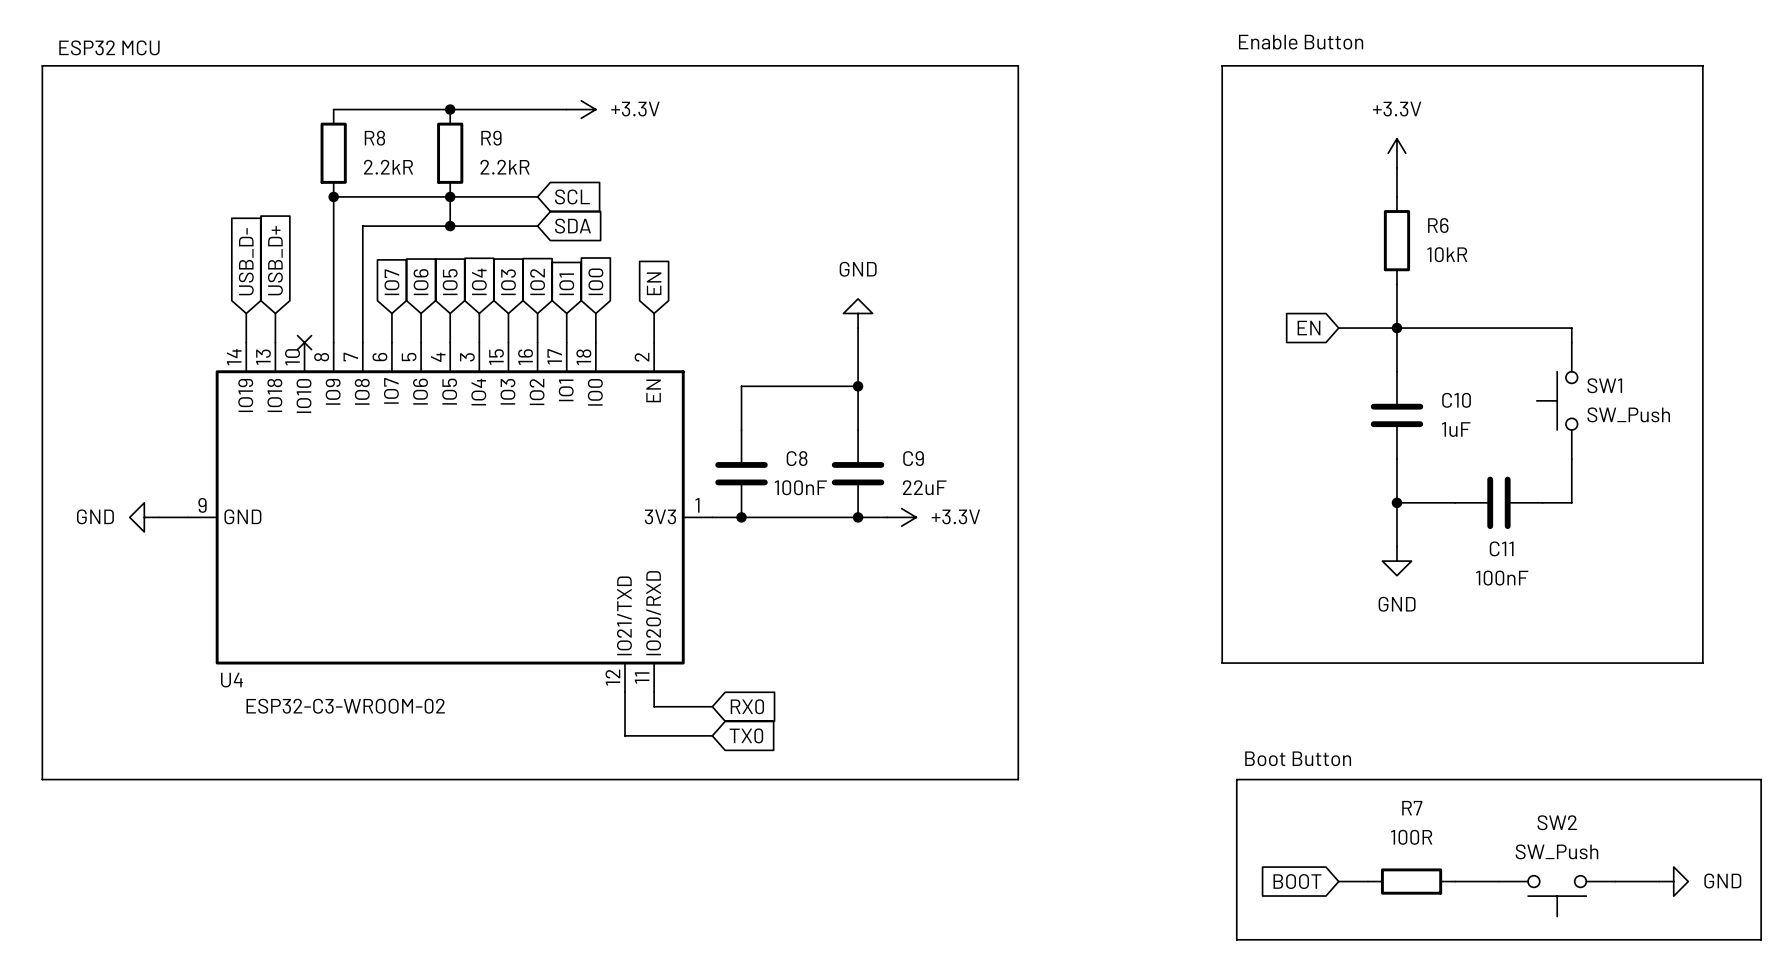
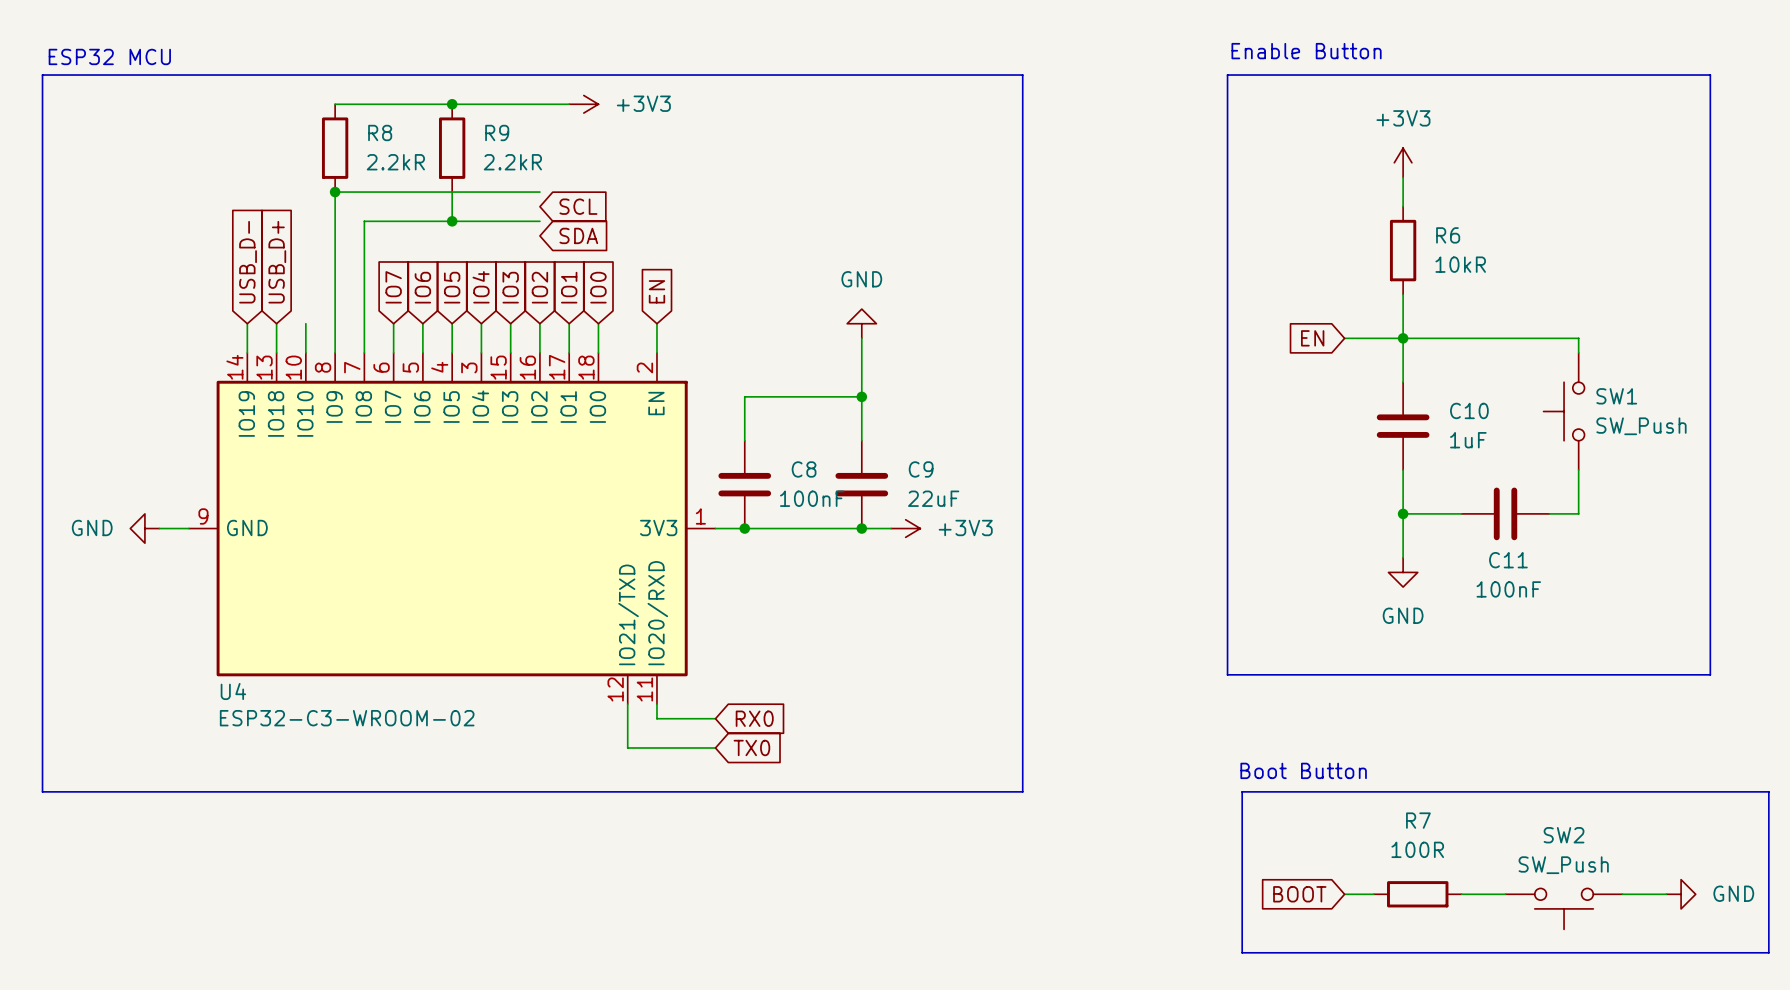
power symbol: none -> +3V3 (583, 104)
wire: (333, 109) (566, 109) -> (335, 104) (569, 104)
junction position: (450, 109) -> (452, 104)
power symbol: +3.3V (581, 109) -> none
R8 position: (333, 153) -> (335, 148)
R9 position: (450, 153) -> (452, 148)
power symbol: +3.3V (1396, 153) -> +3V3 (1403, 162)
wire: (333, 196) (537, 196) -> (335, 206) (335, 192) (539, 192)
junction position: (333, 196) -> (335, 192)
junction: (450, 196) -> none
junction: none -> (452, 221)
wire: (362, 226) (537, 226) -> (364, 235) (364, 221) (539, 221)
junction: (450, 226) -> none
wire: none -> (305, 323) (305, 352)
no-connect mark: (304, 342) -> none
power symbol: +3.3V (901, 517) -> +3V3 (905, 528)

